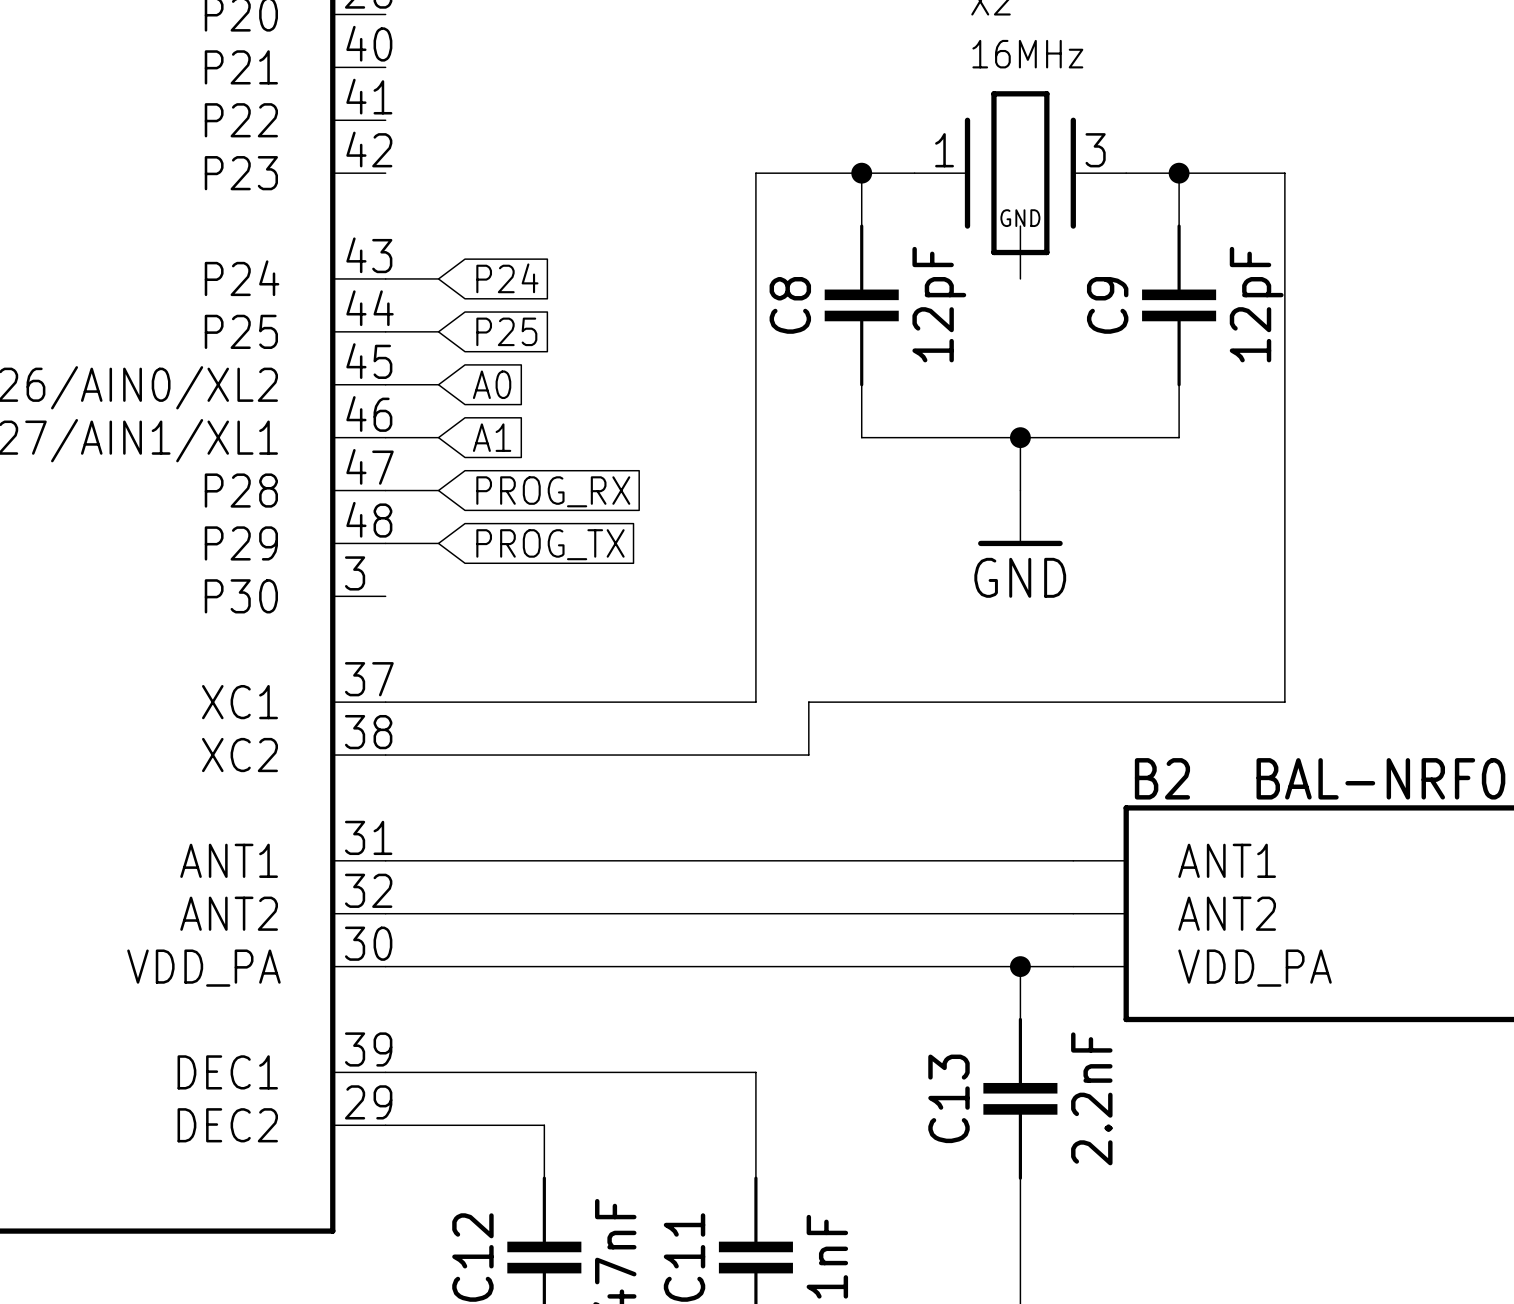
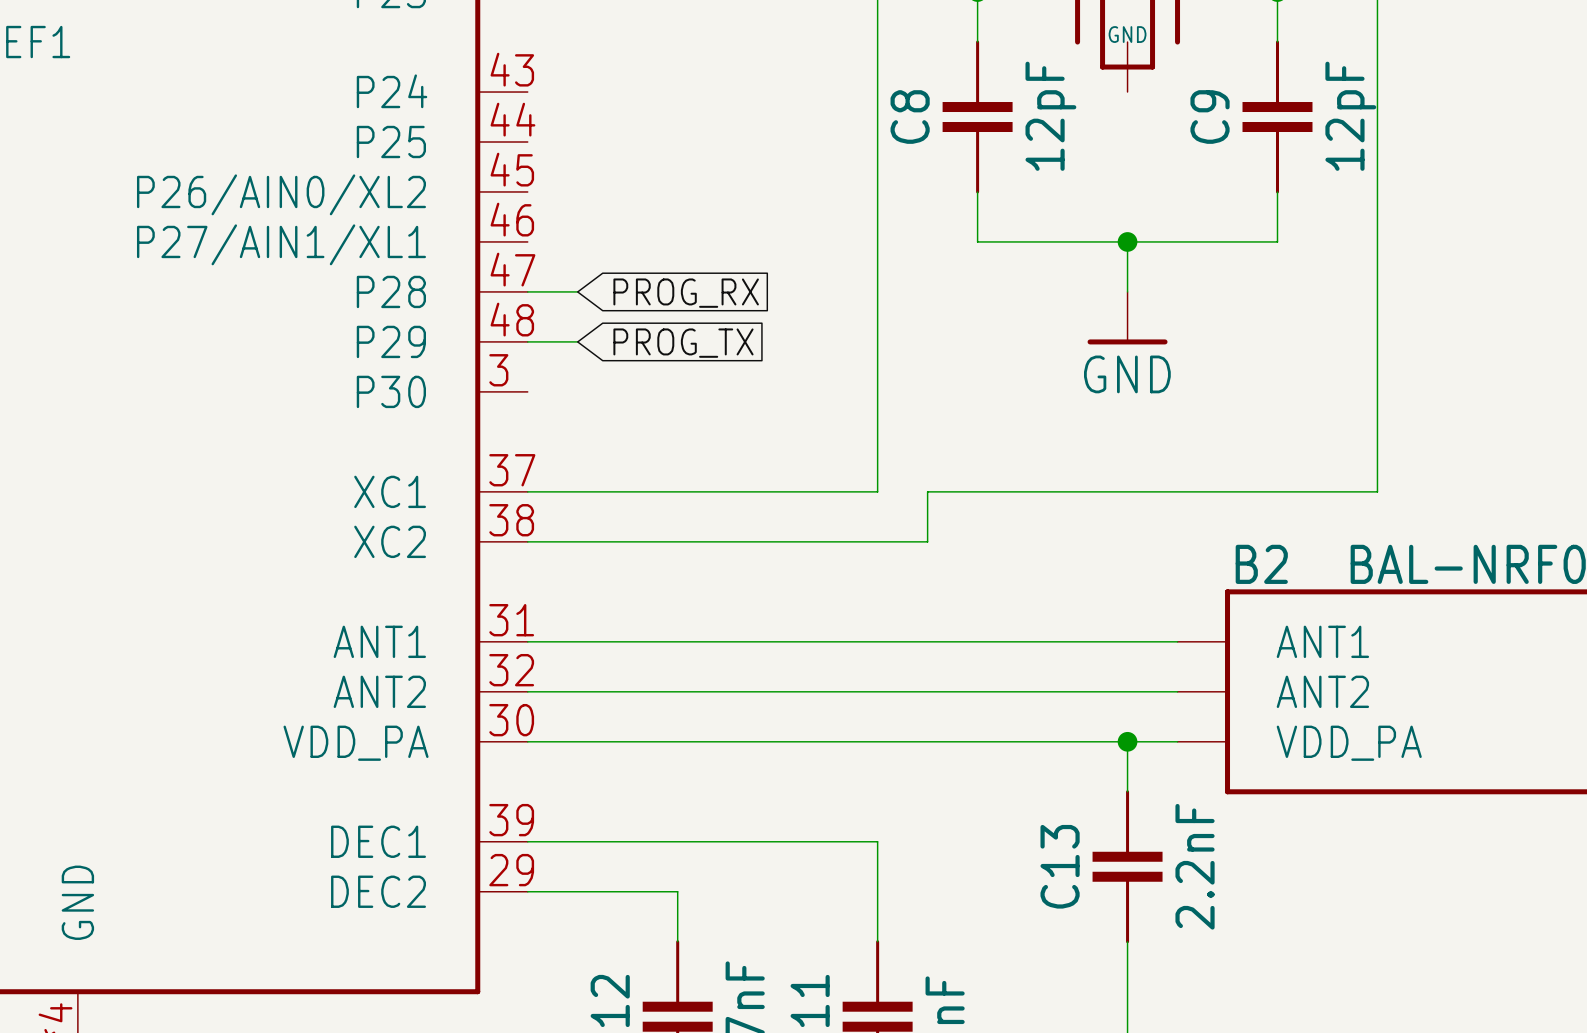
wire: (385, 278) (438, 278) -> none
global label: P24 (507, 278) -> none
wire: (385, 331) (438, 331) -> none
global label: P25 (506, 331) -> none
wire: (385, 384) (438, 384) -> none
global label: A0 (492, 384) -> none
wire: (385, 437) (438, 437) -> none
global label: A1 (492, 437) -> none

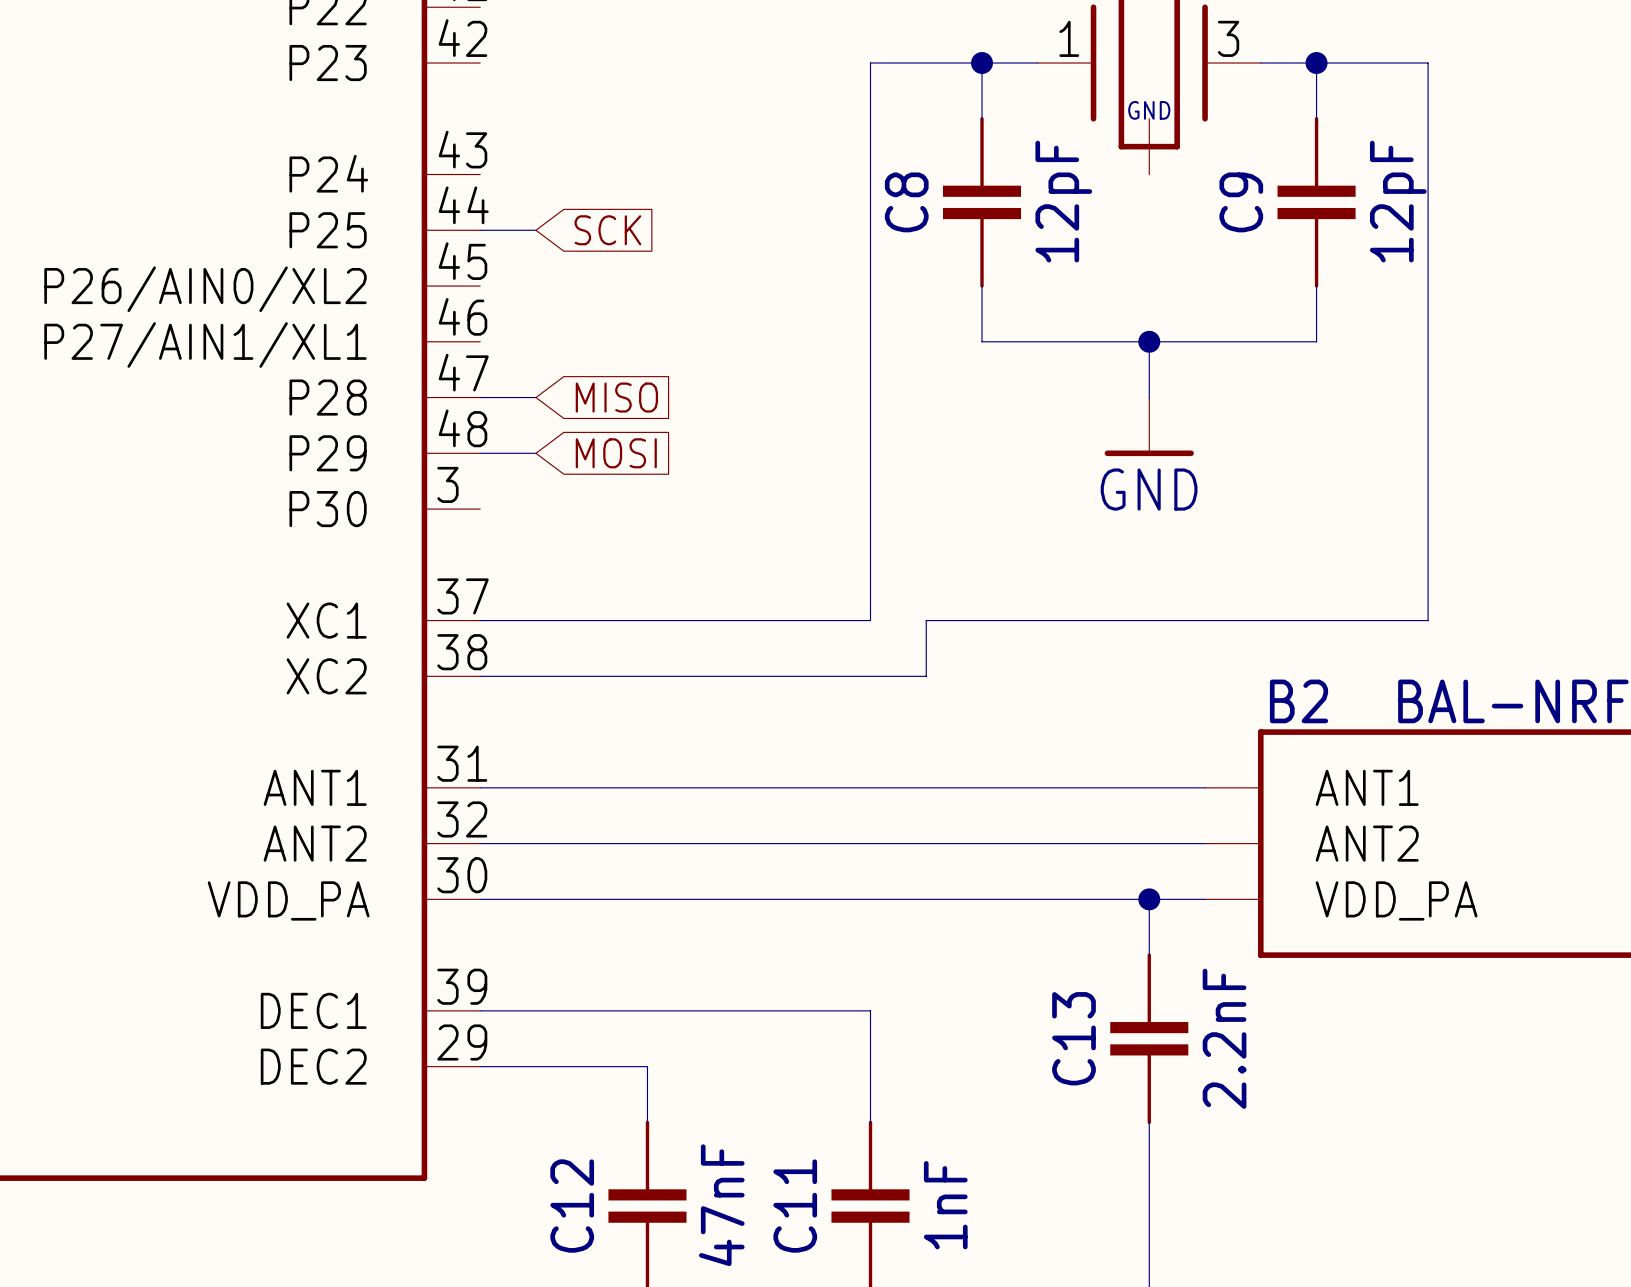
wire: none -> (480, 230) (535, 230)
global label: none -> SCK (607, 230)
global label: PROG_RX (686, 293) -> MISO (616, 397)
global label: PROG_TX (683, 343) -> MOSI (616, 453)

